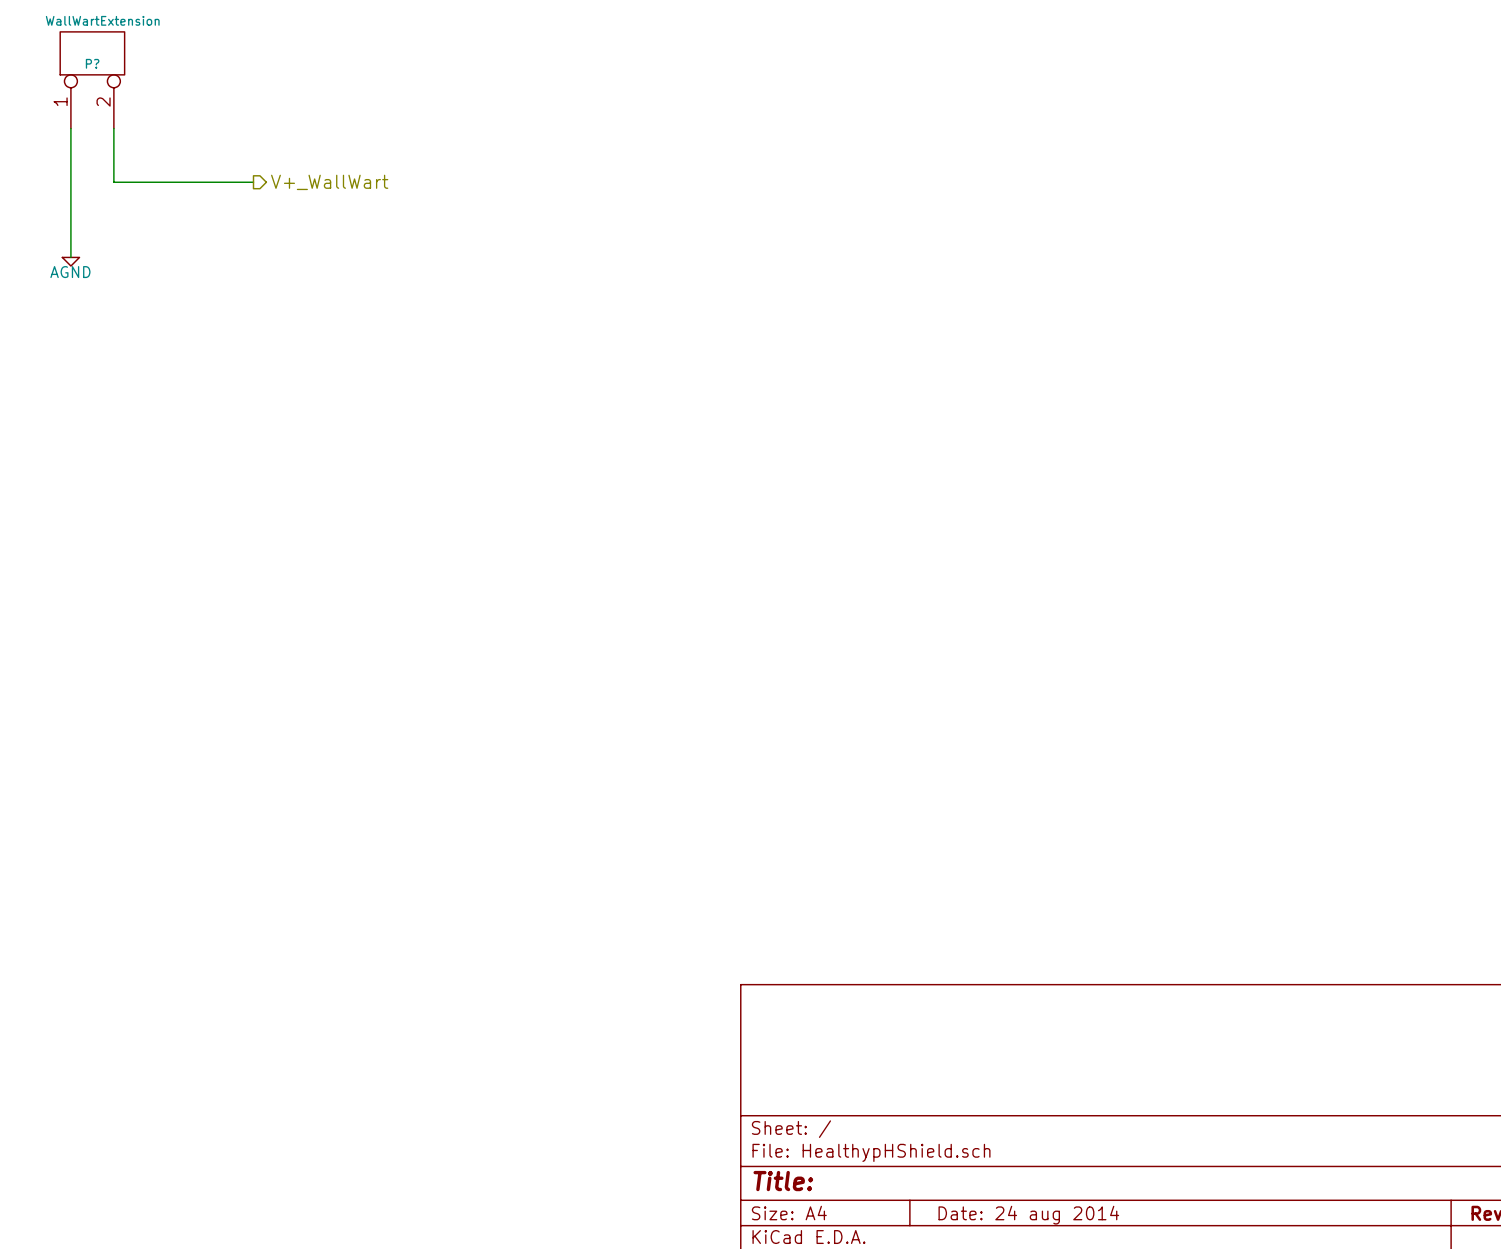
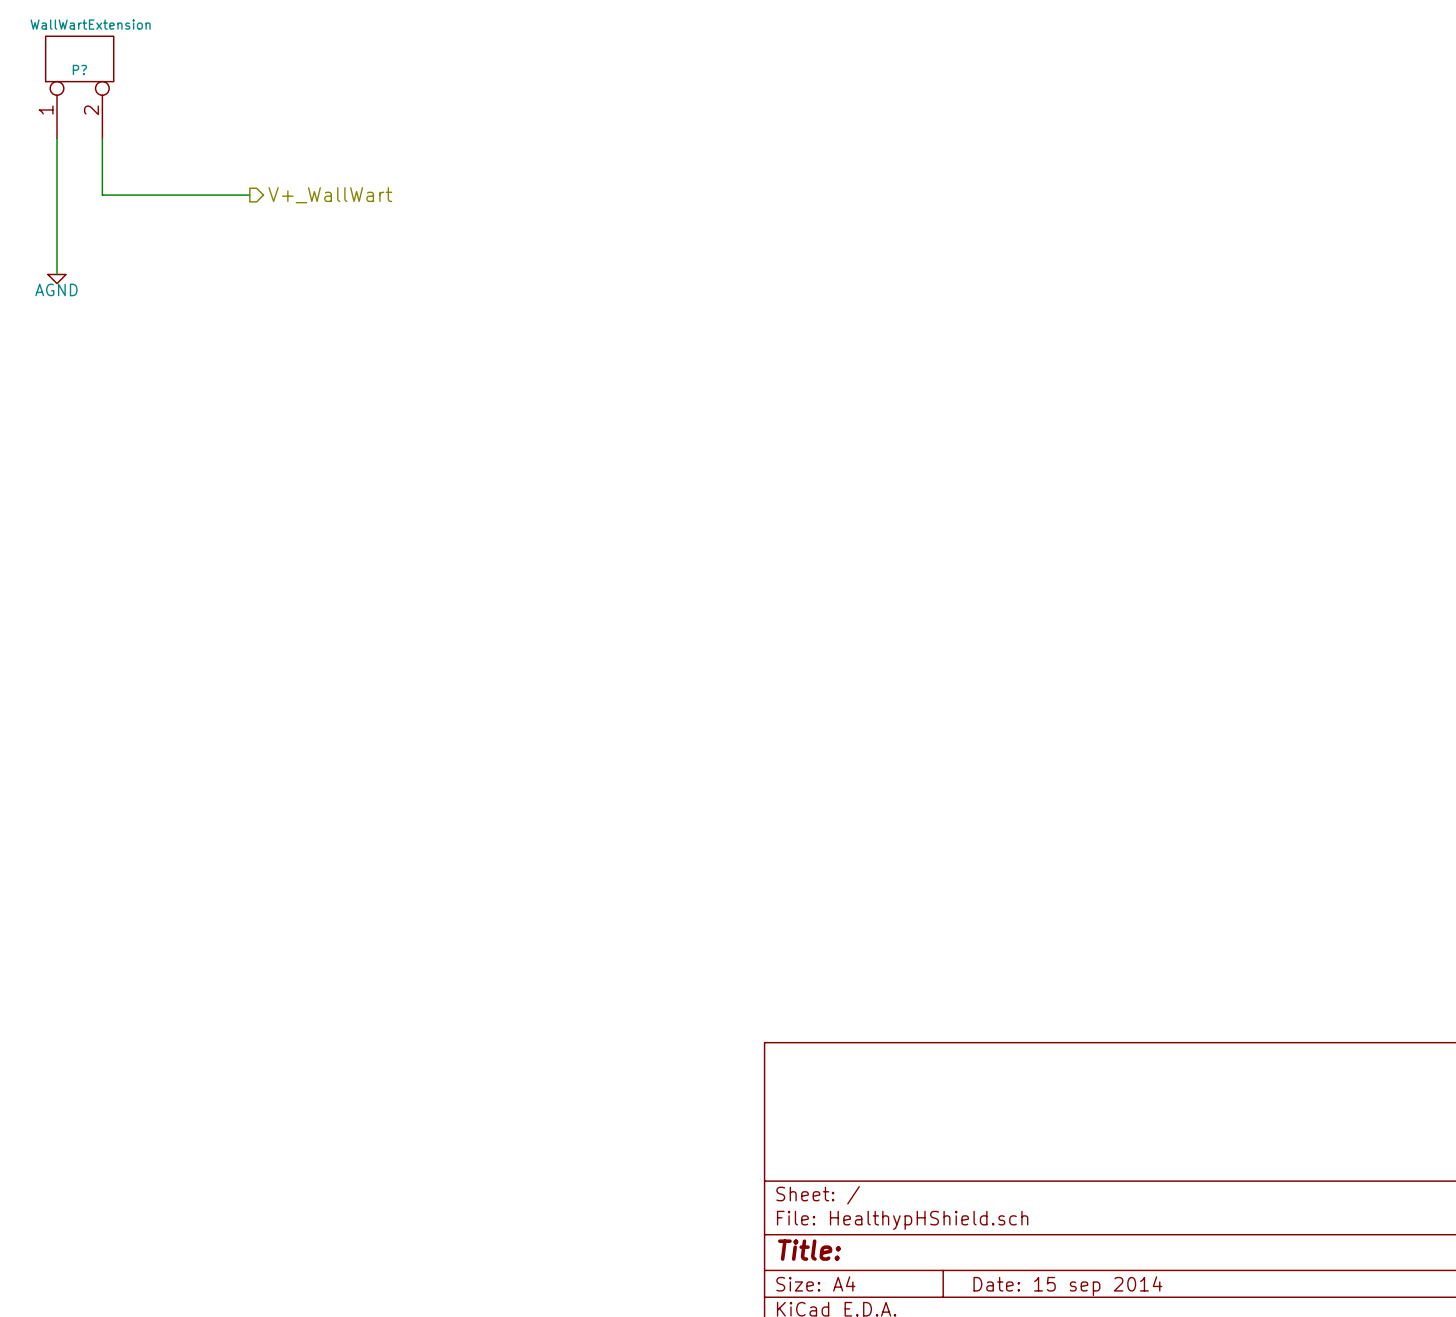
title block: Date: 24 aug 2014 (1028, 1215) -> Date: 15 sep 2014 (1067, 1286)

